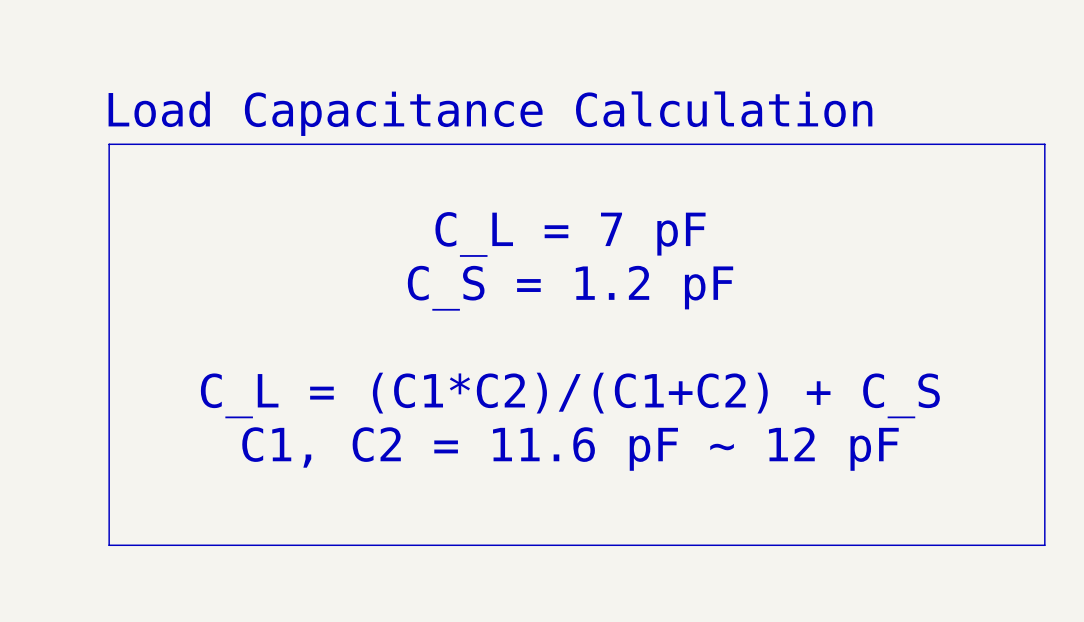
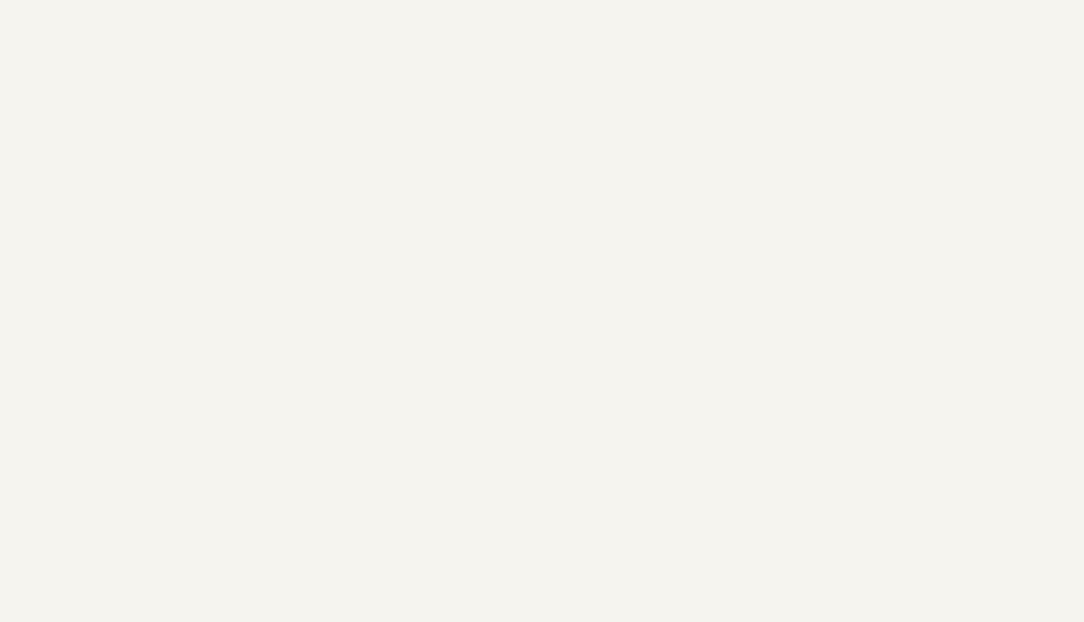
text: Load Capacitance Calculation (490, 113) -> none
line: (109, 144) (1044, 144) (1044, 545) (109, 545) (109, 144) -> none
text: C_L = 7 pF (570, 234) -> none
text: C_S = 1.2 pF (570, 288) -> none
text: C_L = (C1*C2)/(C1+C2) + C_S (570, 395) -> none
text: C1, C2 = 11.6 pF ~ 12 pF (570, 449) -> none

